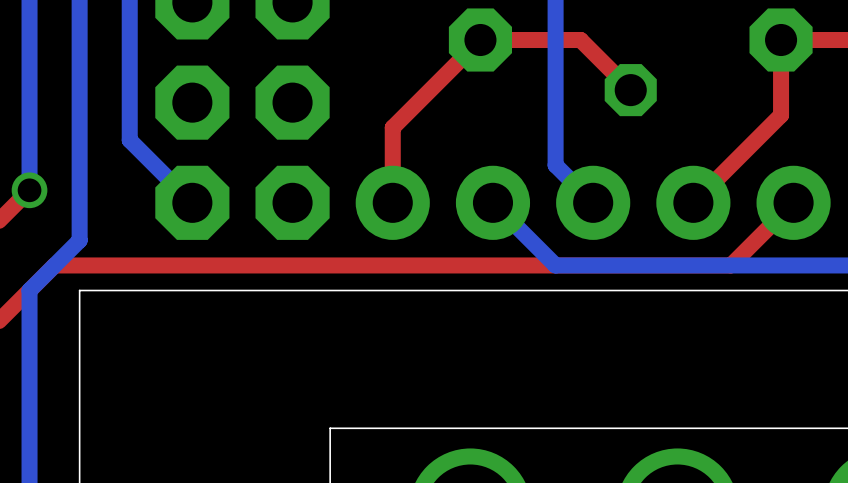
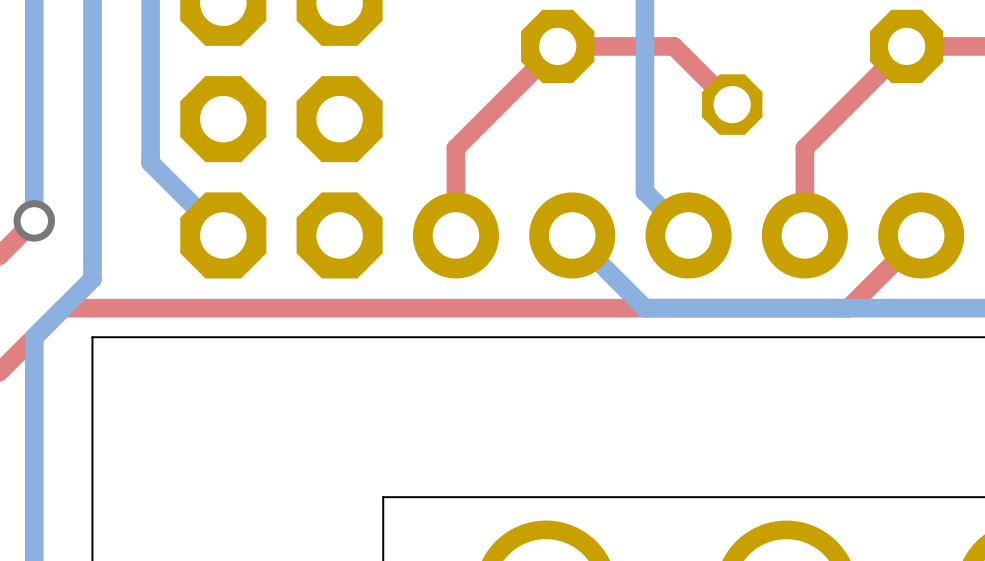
top track: (781, 40) (781, 115) (693, 202) -> (906, 46) (804, 148) (804, 235)

